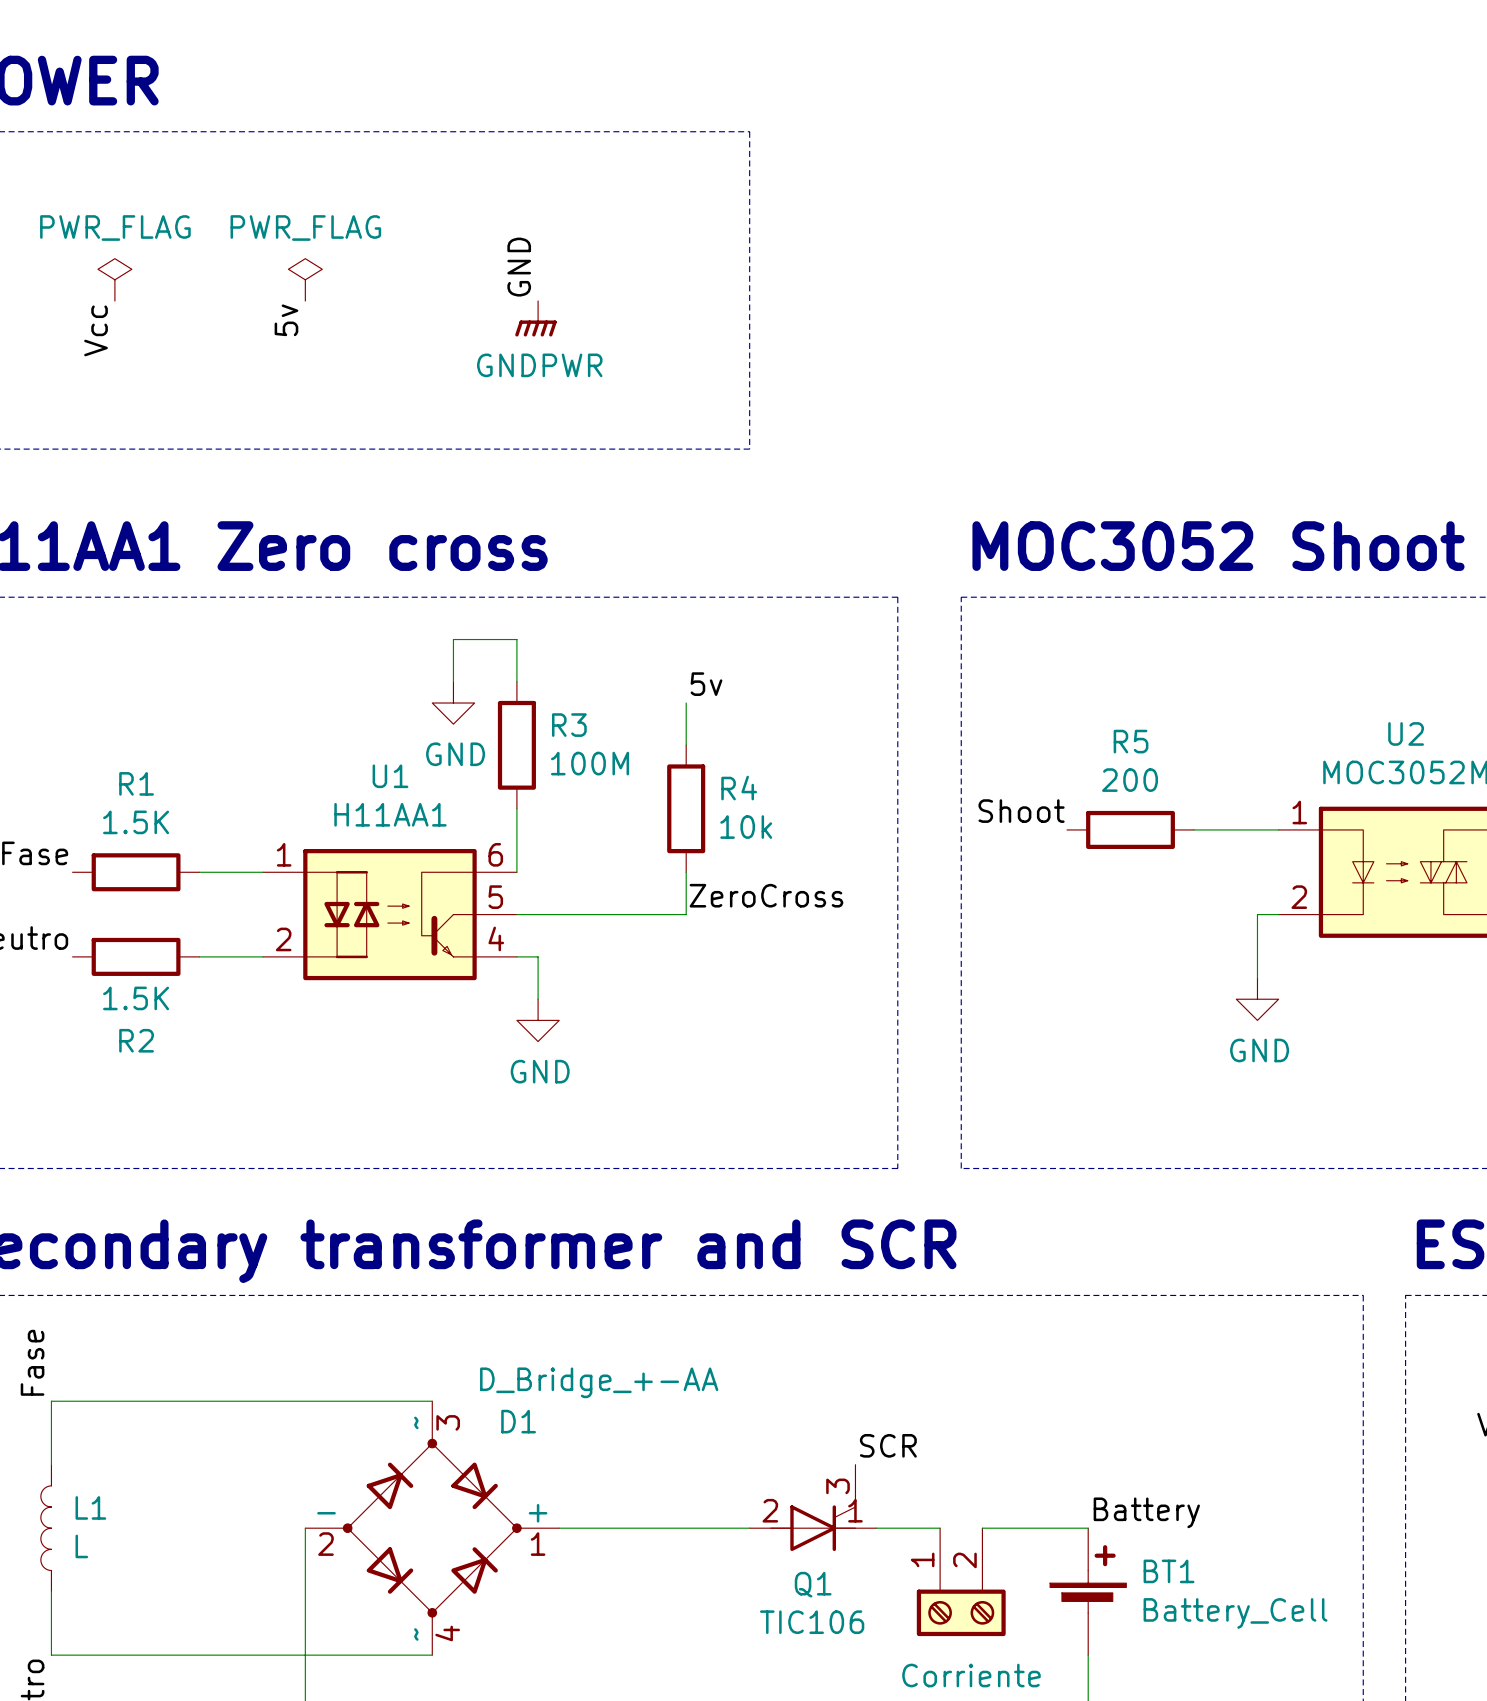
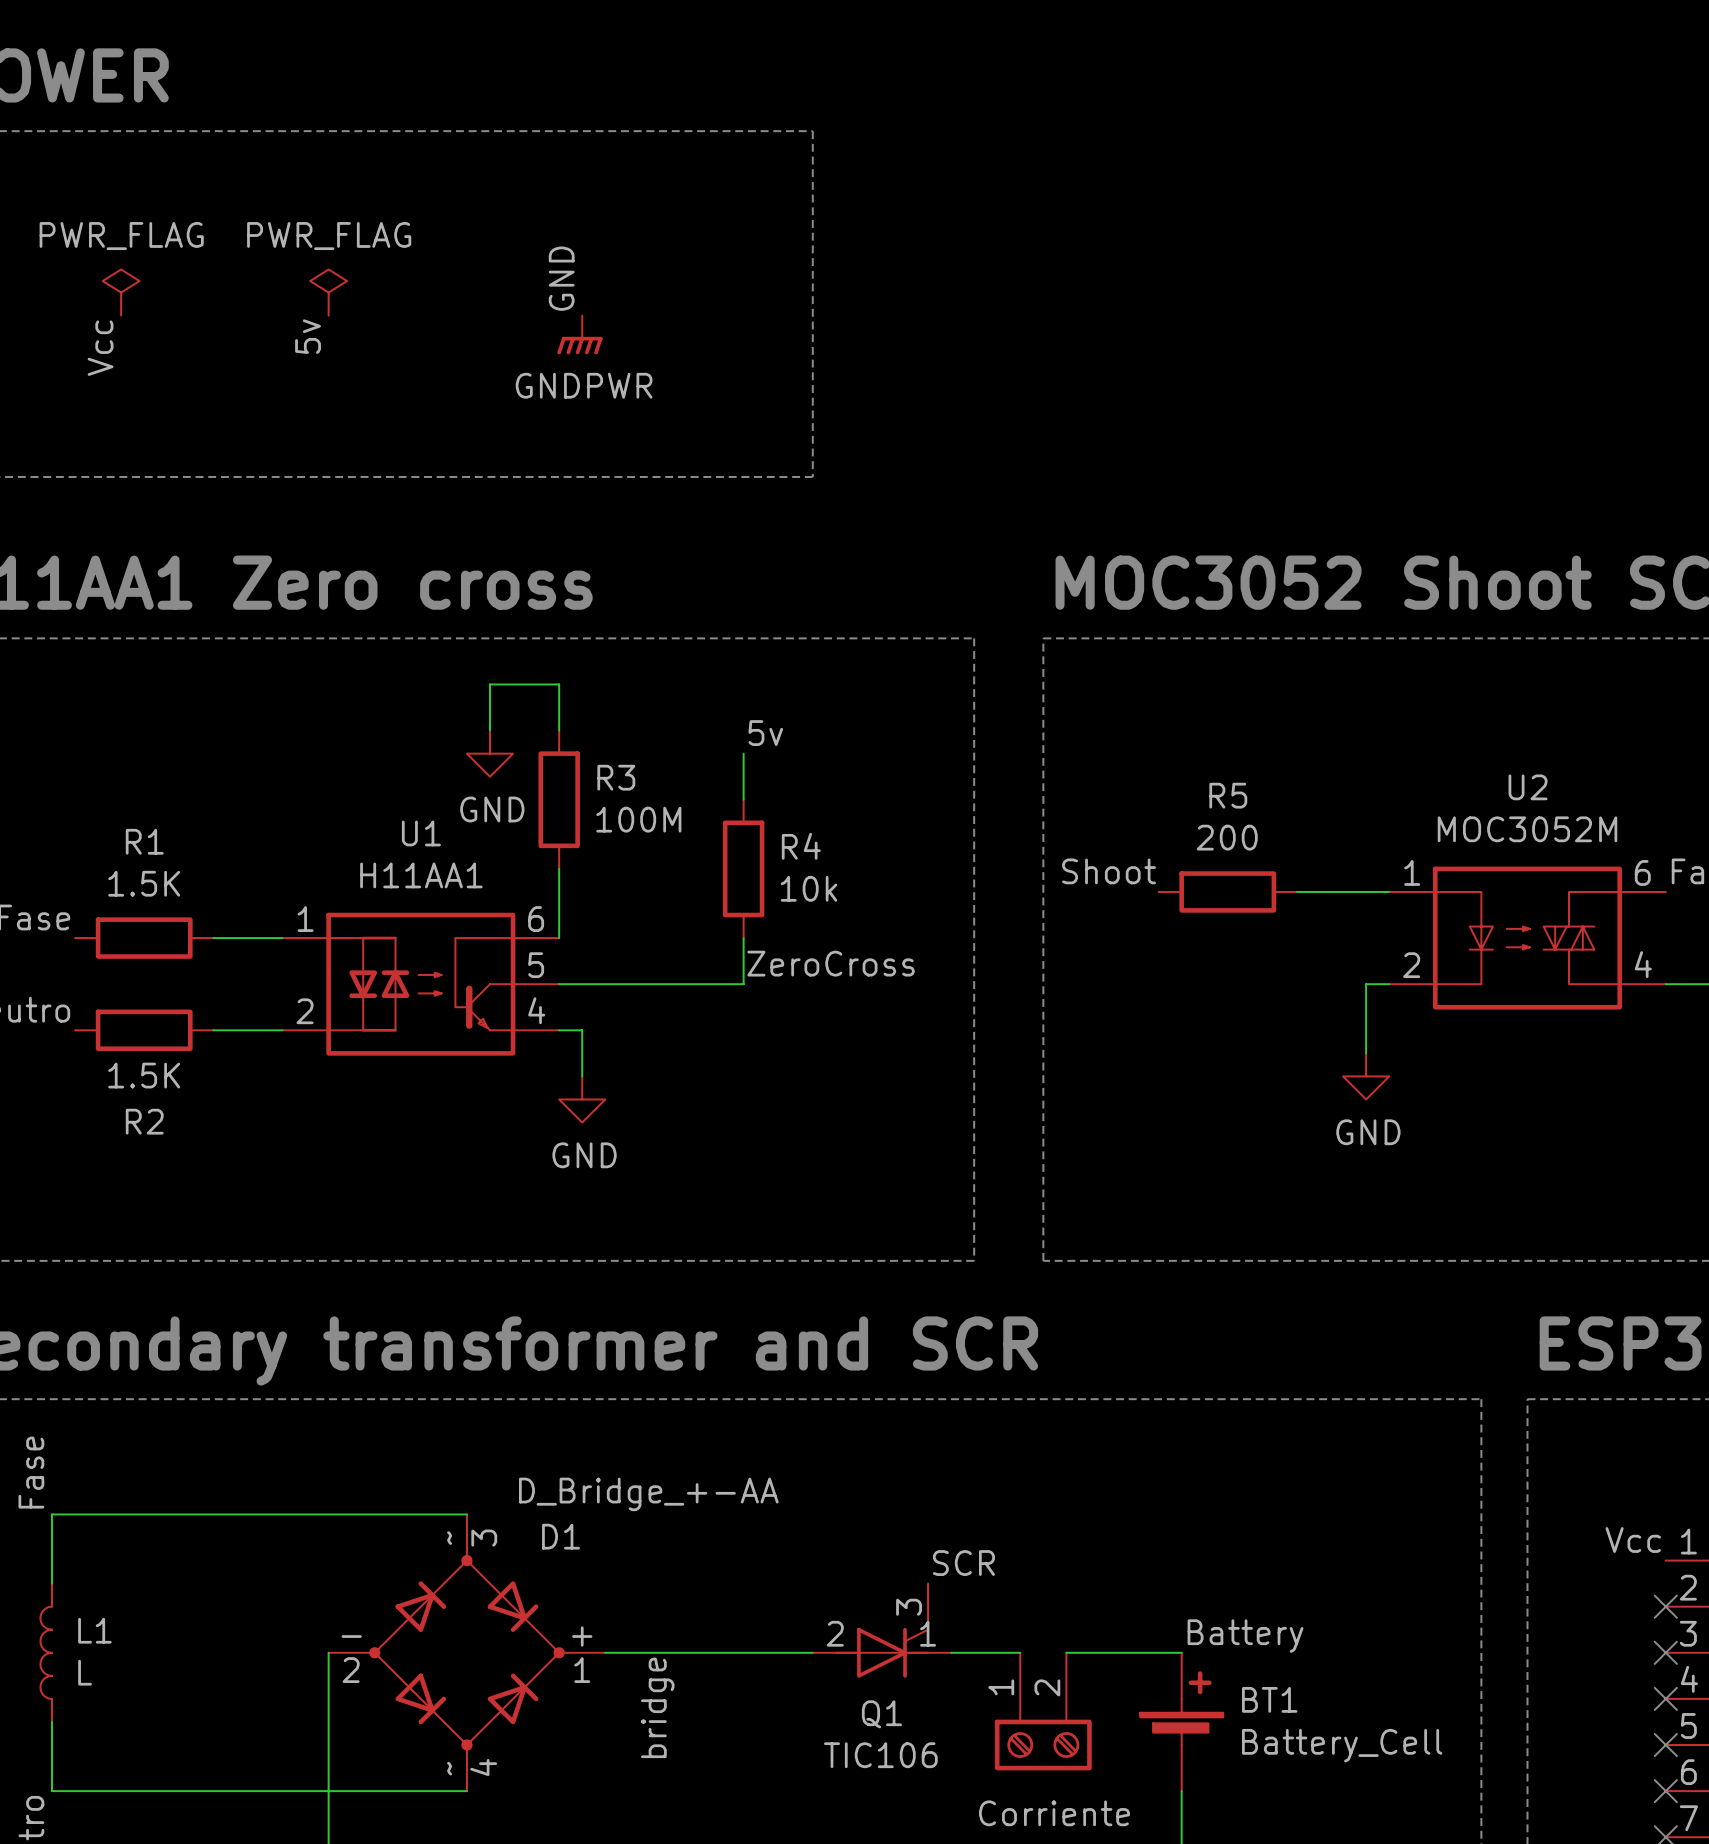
label: none -> bridge (657, 1707)

